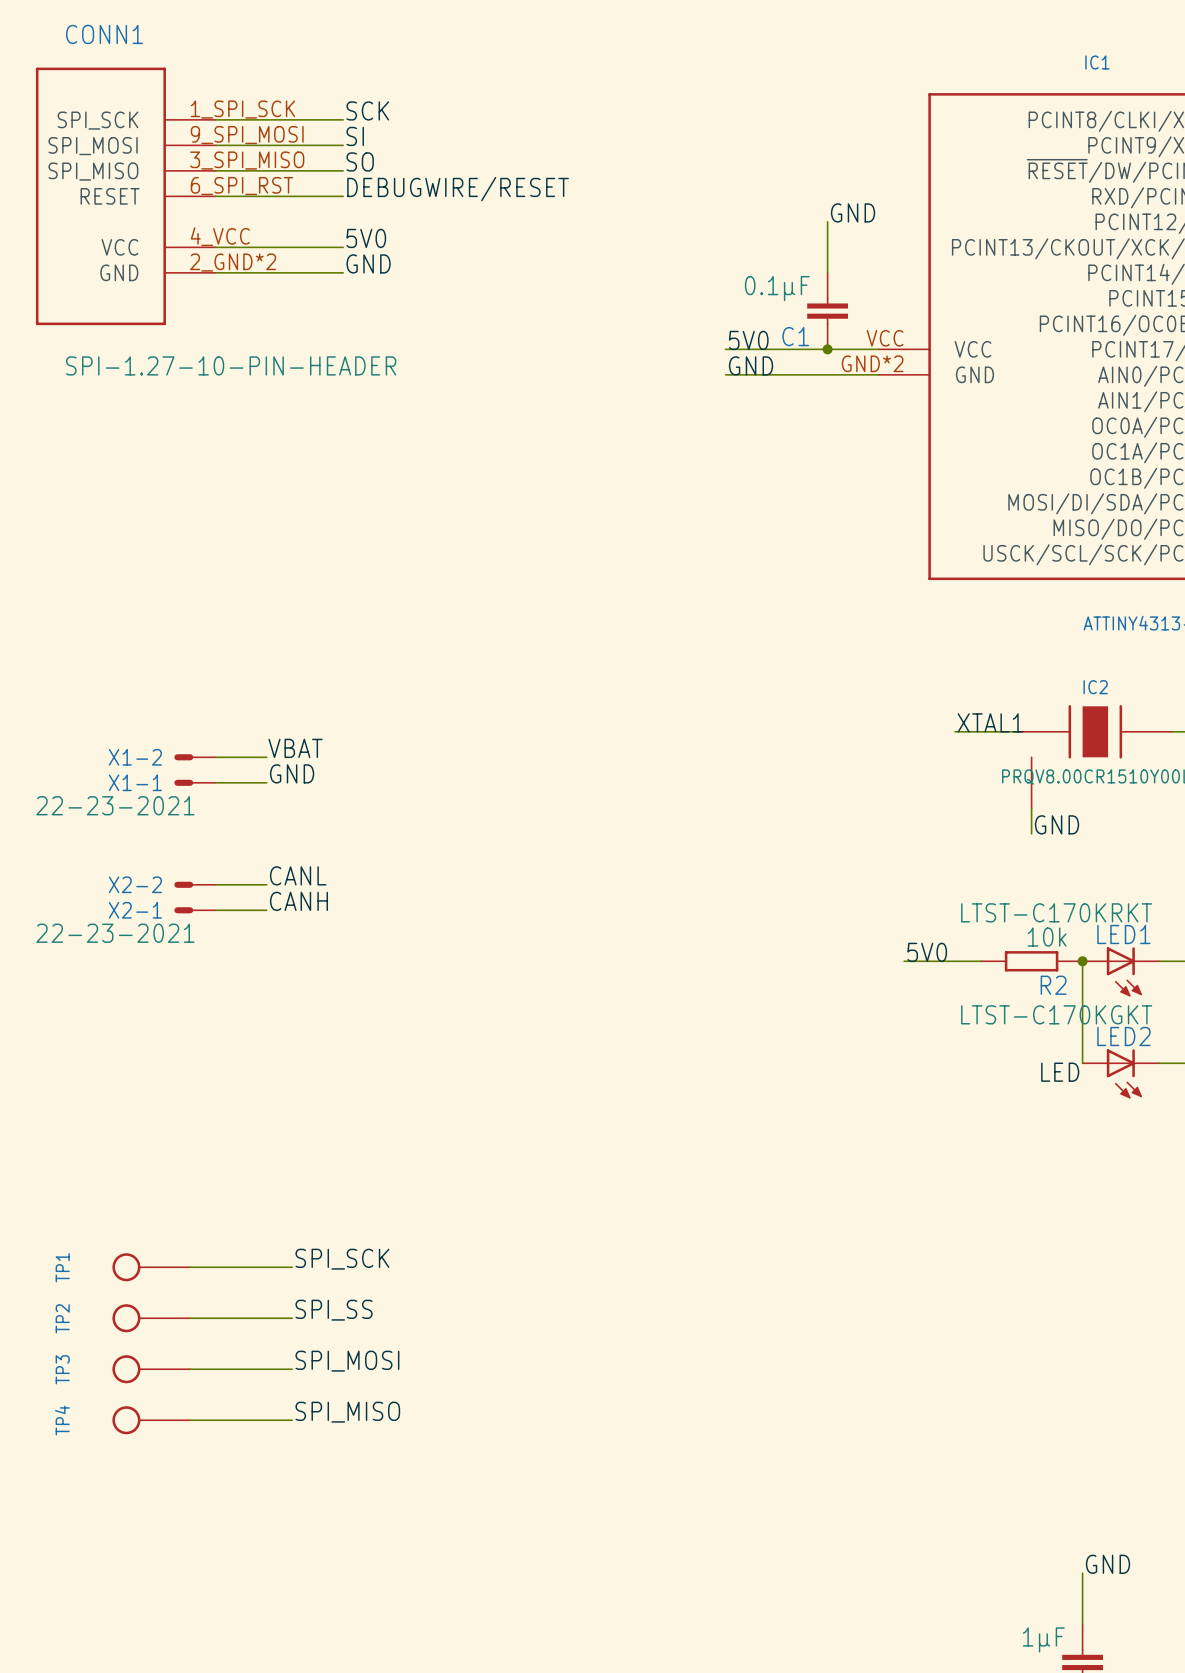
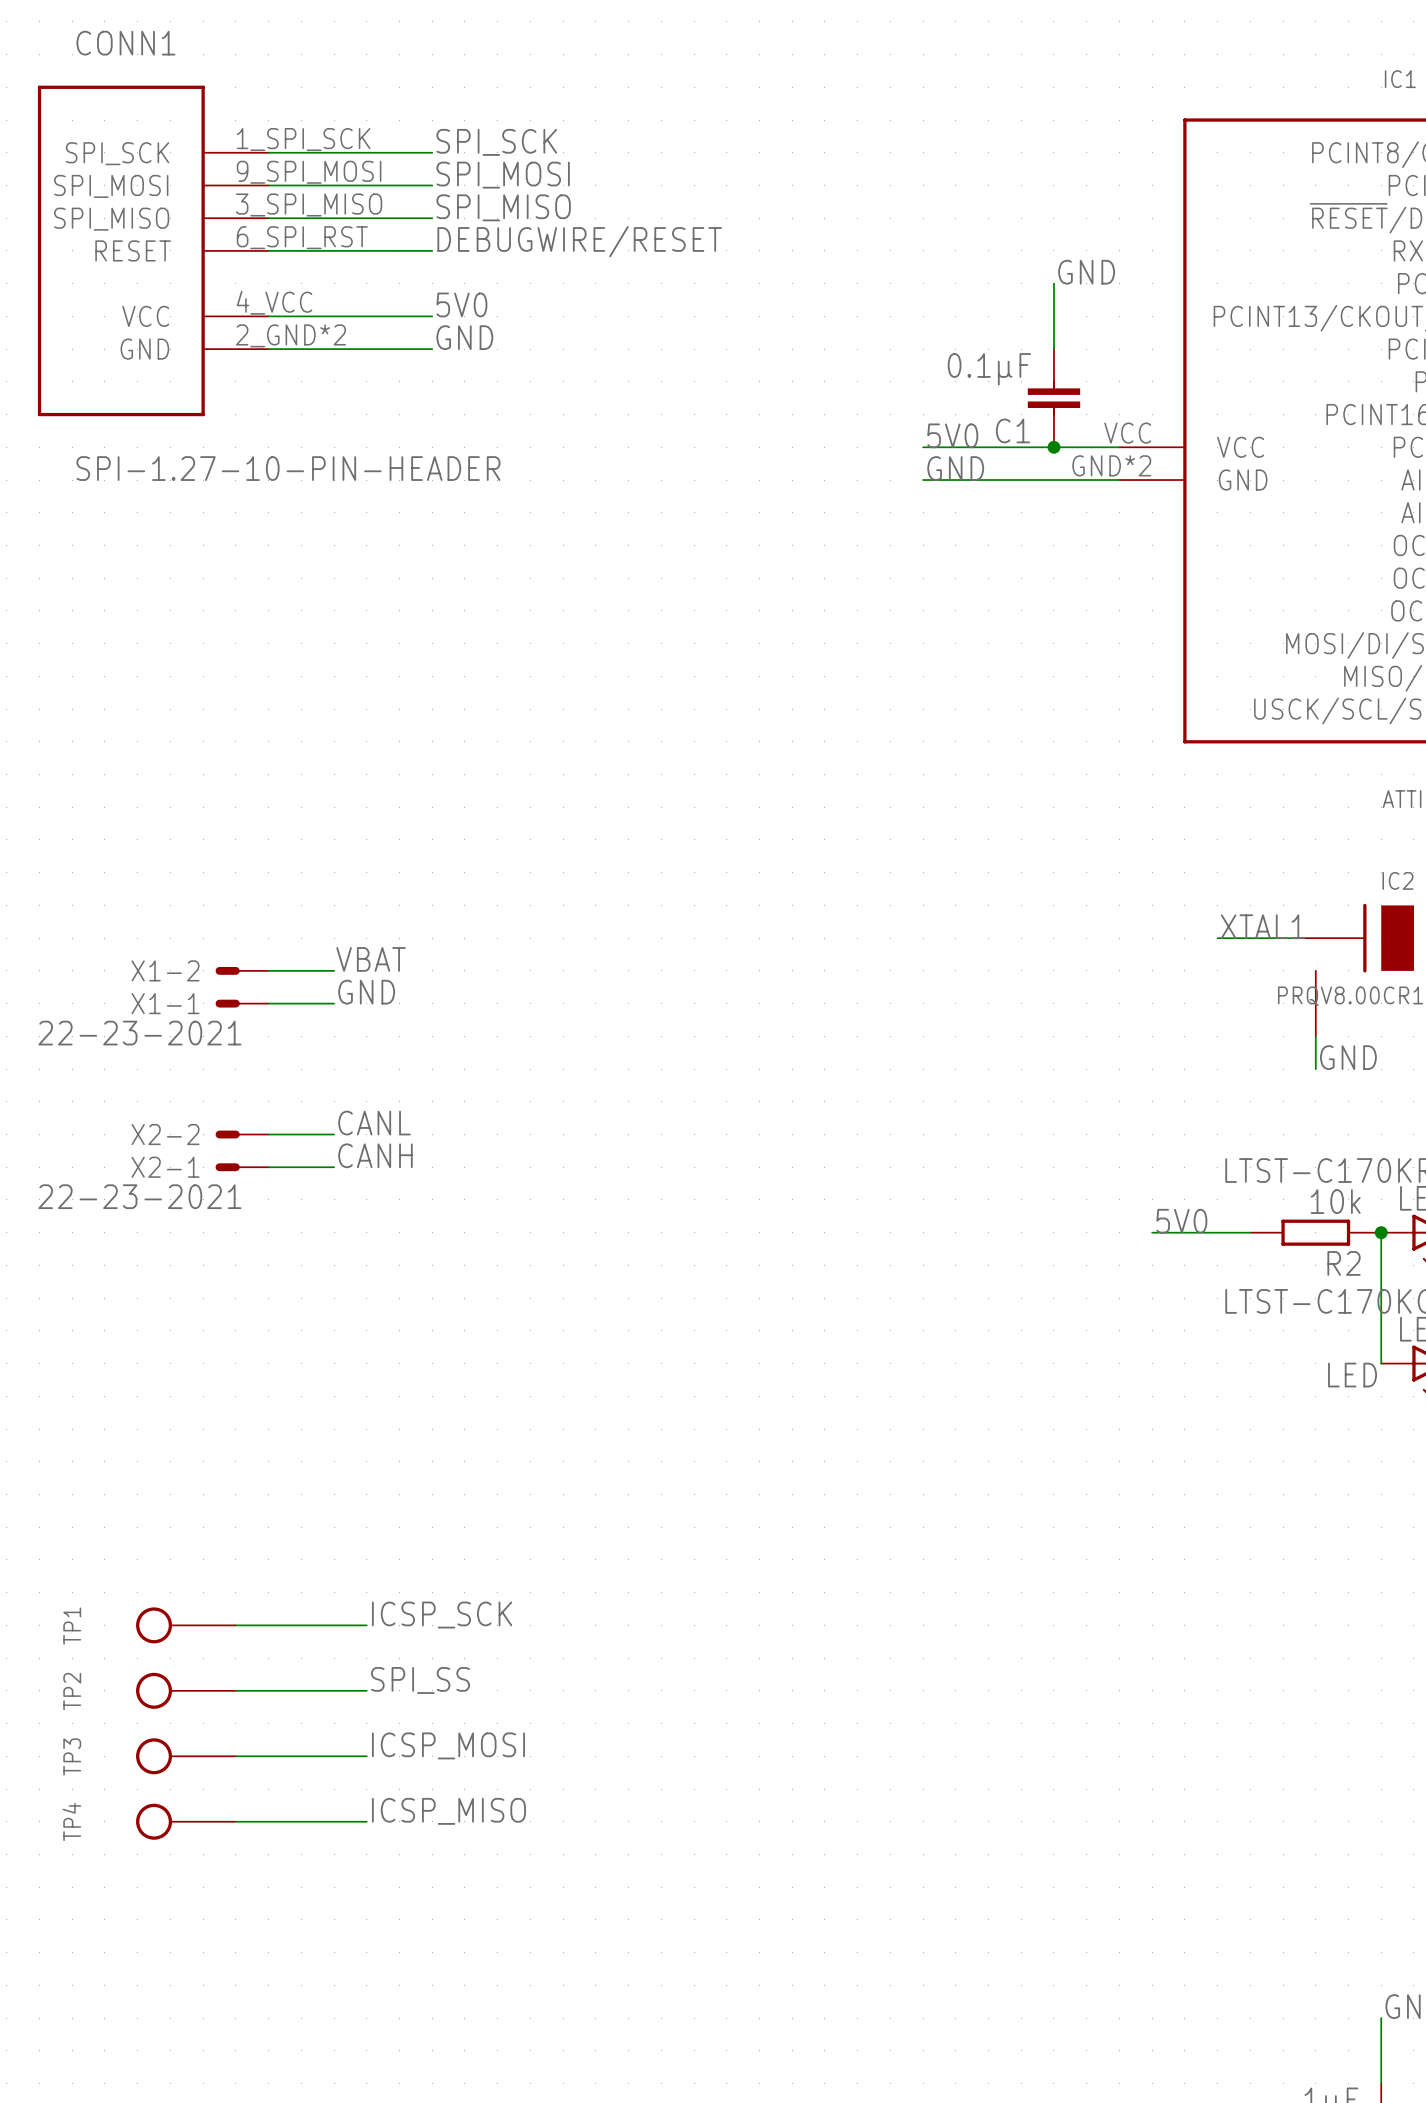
label: SCK (367, 110) -> SPI_SCK (496, 142)
label: SI (355, 136) -> SPI_MOSI (503, 175)
label: SO (360, 161) -> SPI_MISO (503, 207)
label: SPI_SCK (342, 1259) -> ICSP_SCK (442, 1615)
label: SPI_MOSI (347, 1361) -> ICSP_MOSI (448, 1745)
label: SPI_MISO (347, 1412) -> ICSP_MISO (448, 1811)

